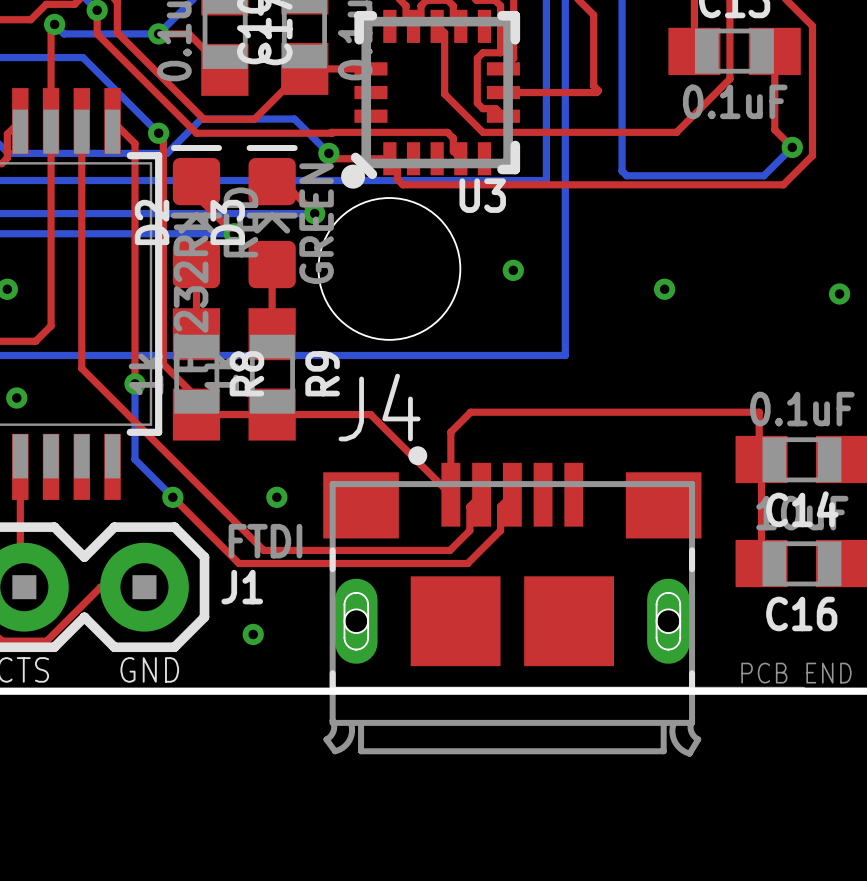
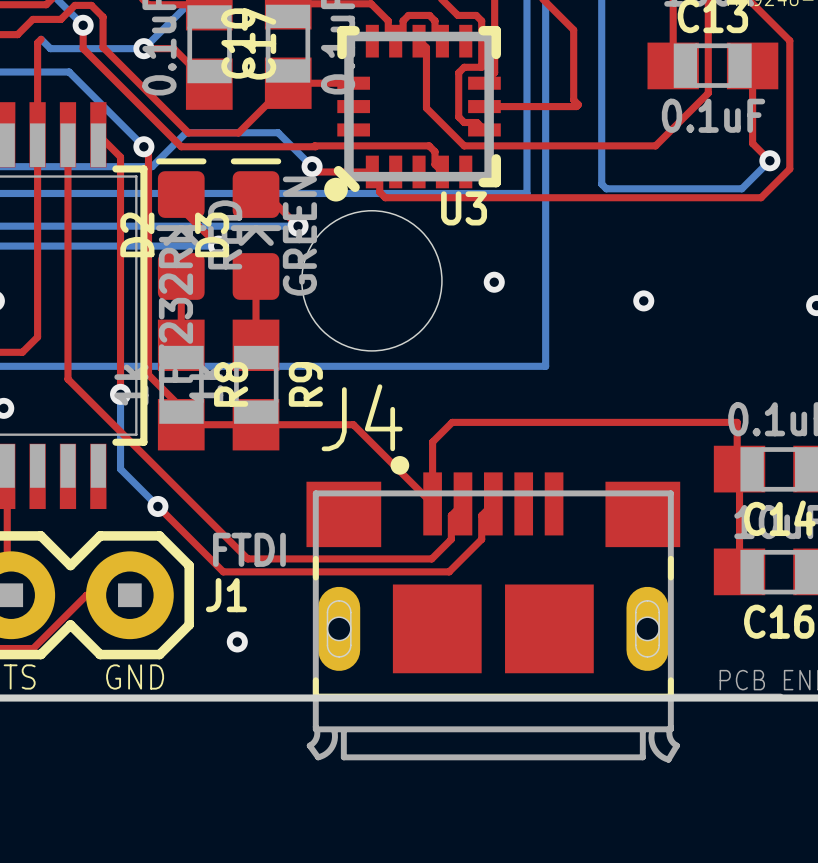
via: (54, 24) -> none
via: (276, 497) -> none

